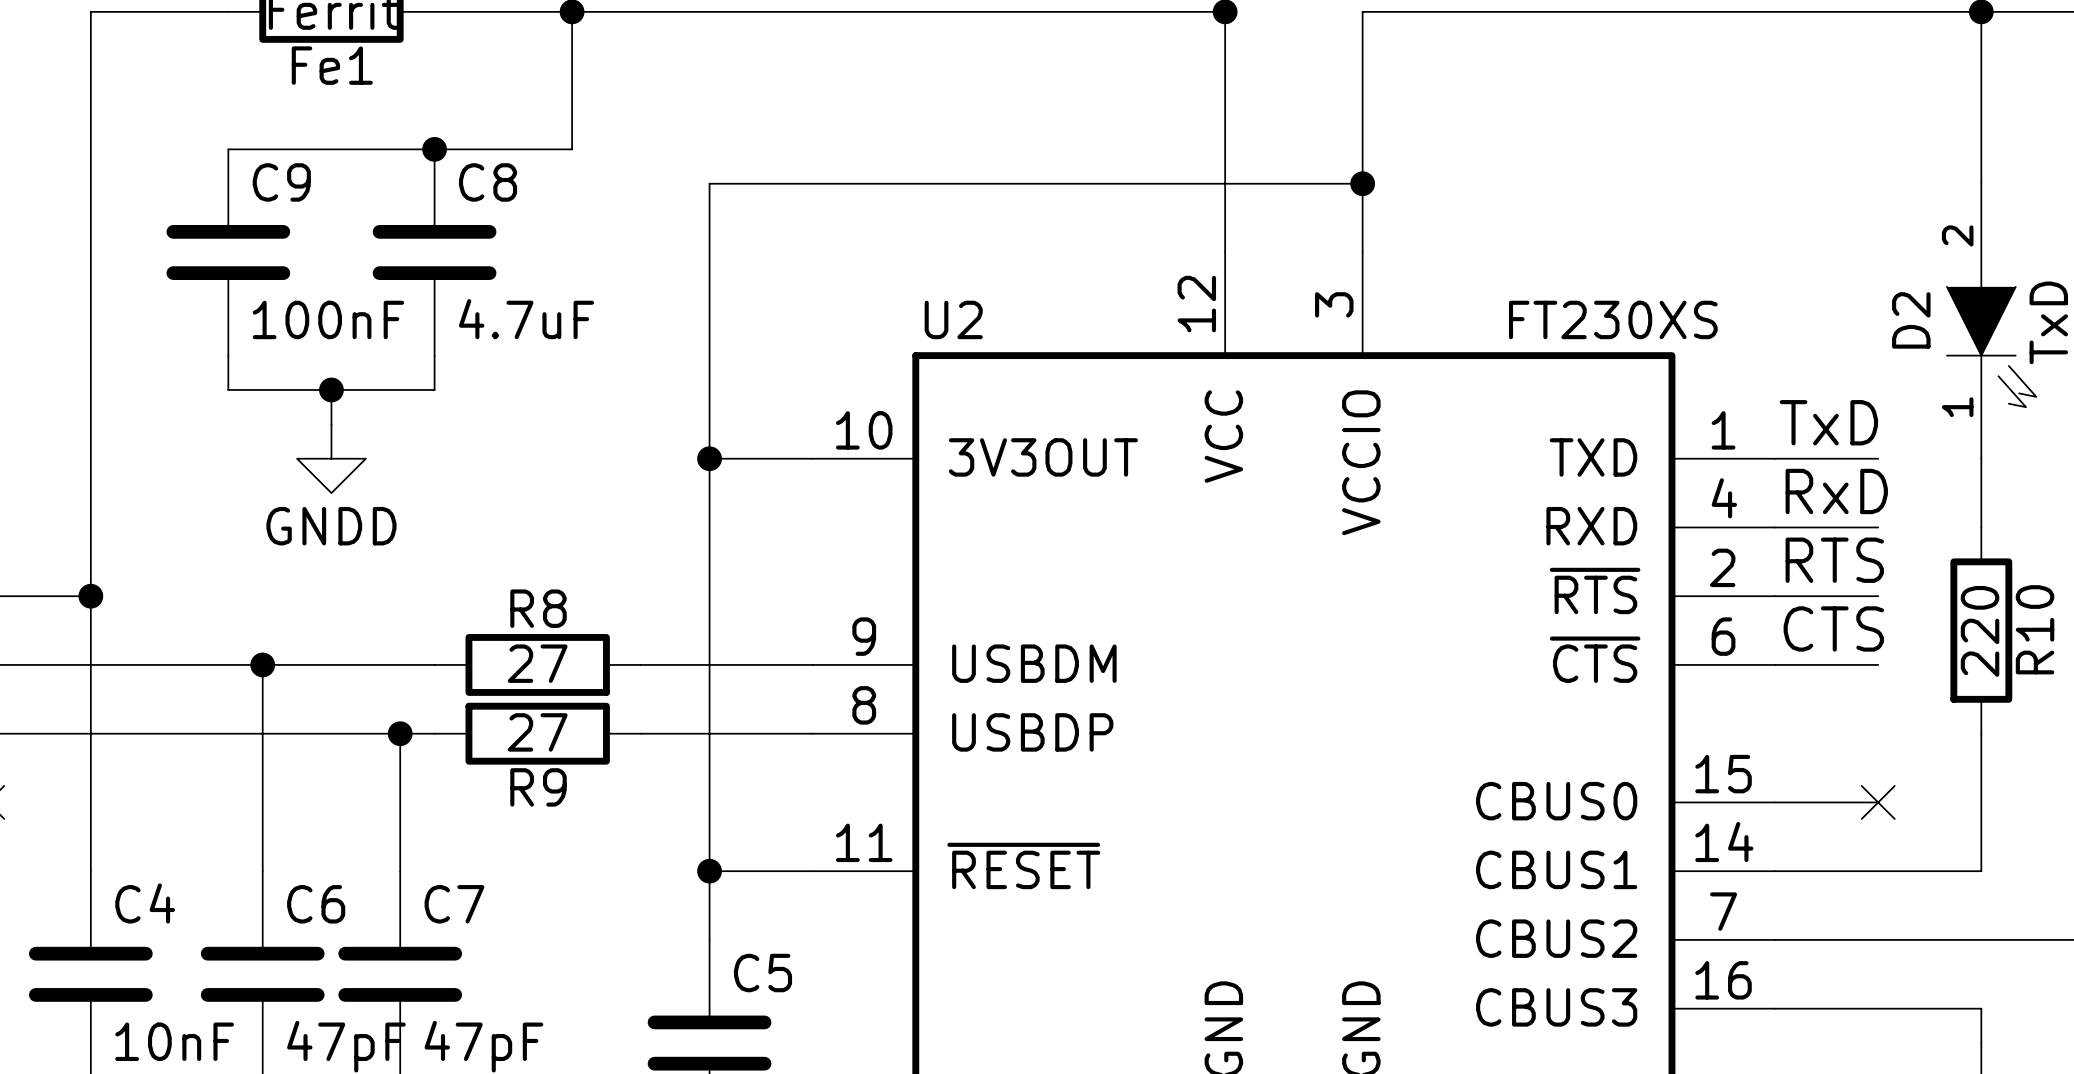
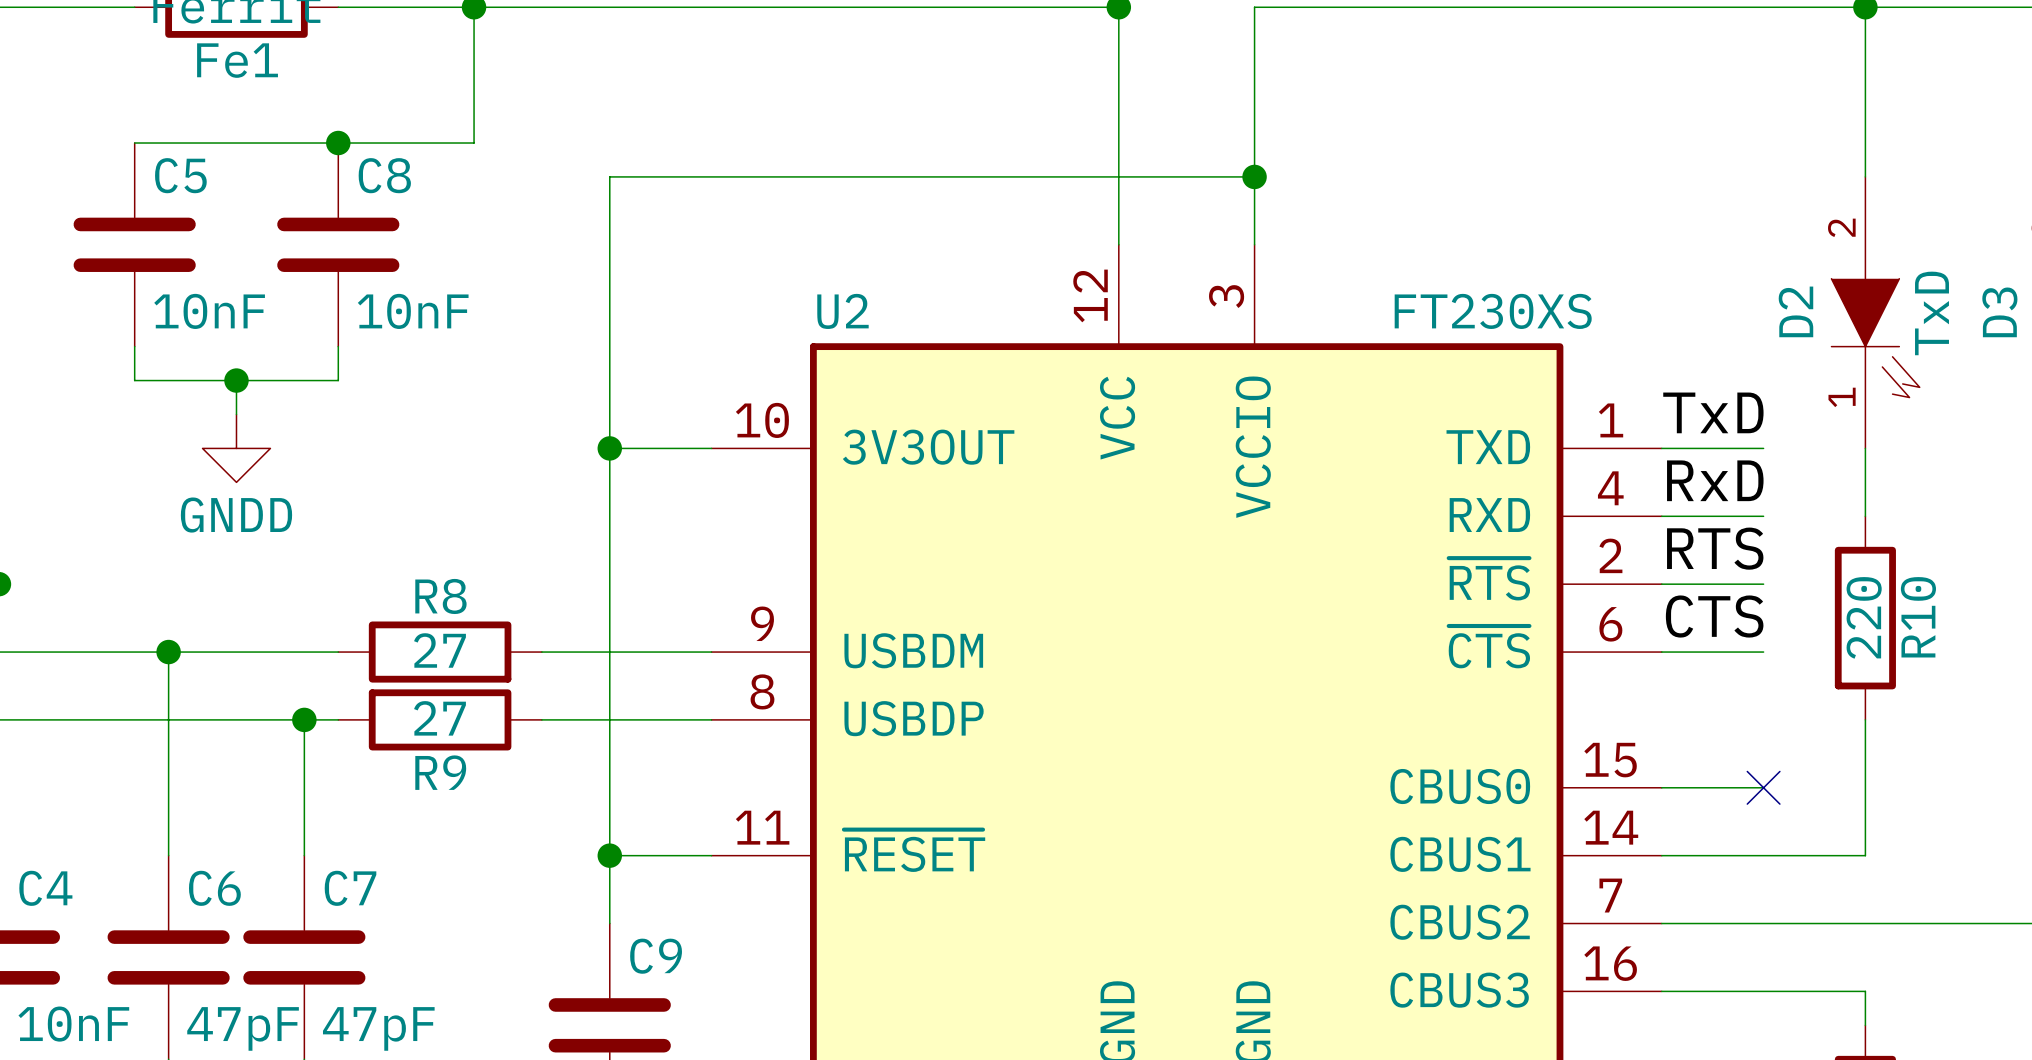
C9 name: C9 (281, 182) -> C5 (180, 175)
C9 value: 100nF (328, 319) -> 10nF (209, 311)
C8 value: 4.7uF (526, 319) -> 10nF (413, 311)
C5 name: C5 (763, 973) -> C9 (656, 956)

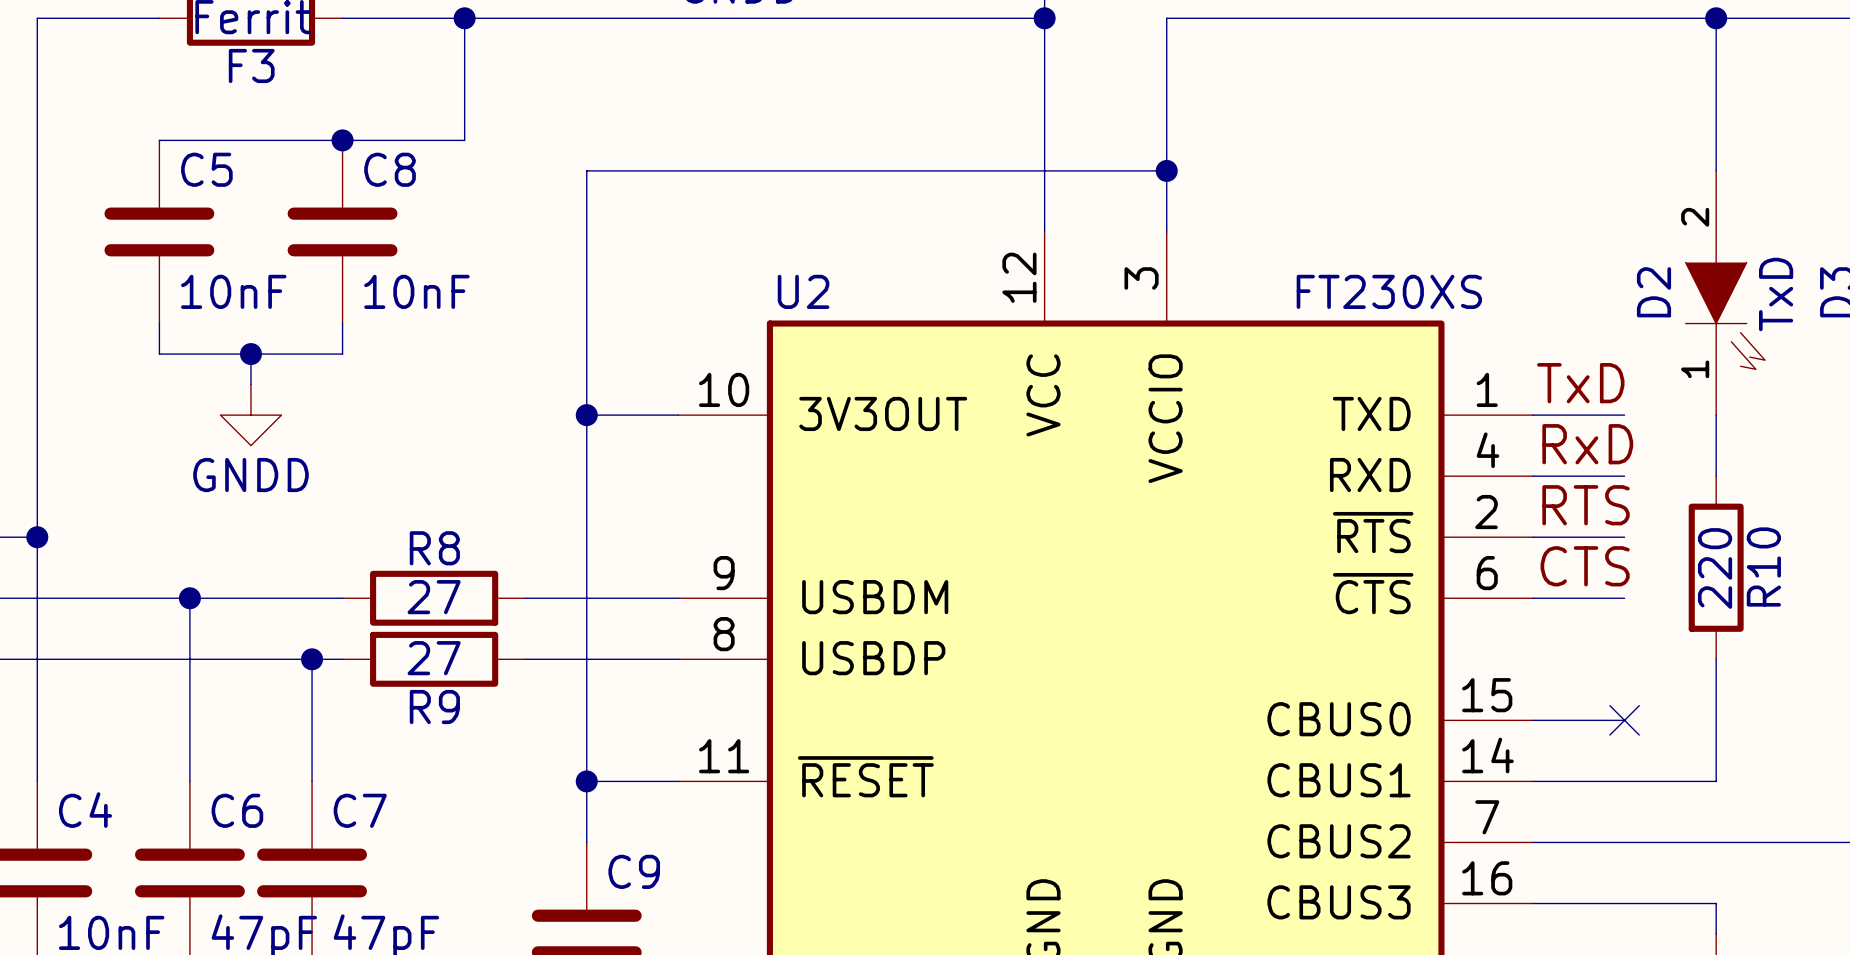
Fe1 name: Fe1 (237, 60) -> F3 (251, 65)

